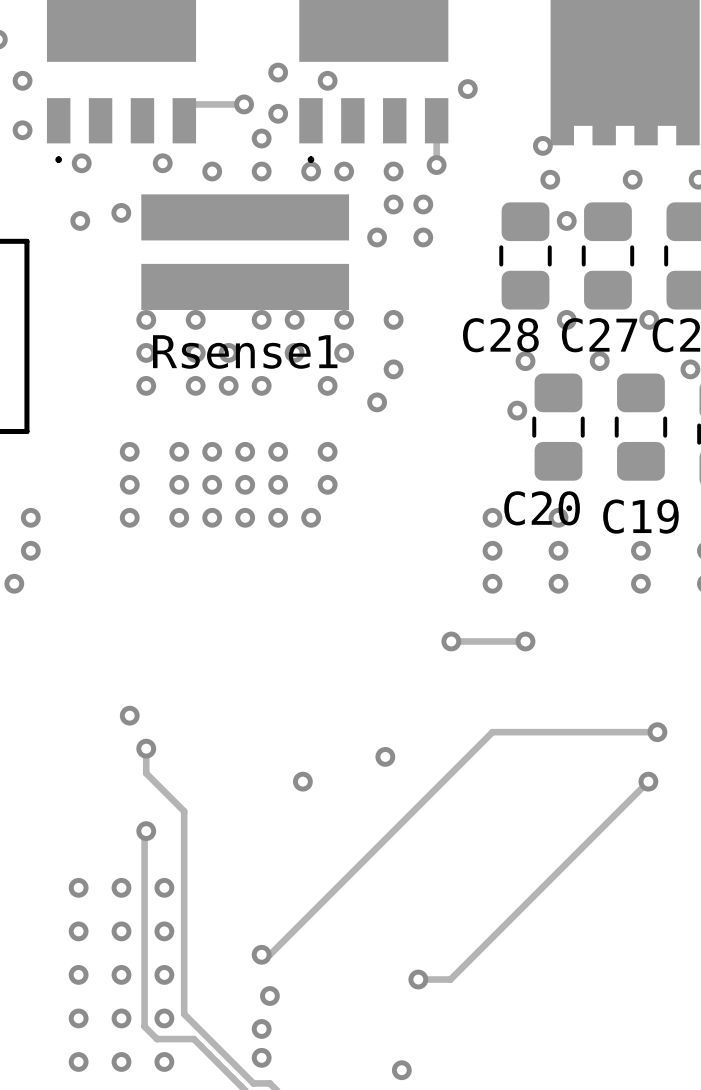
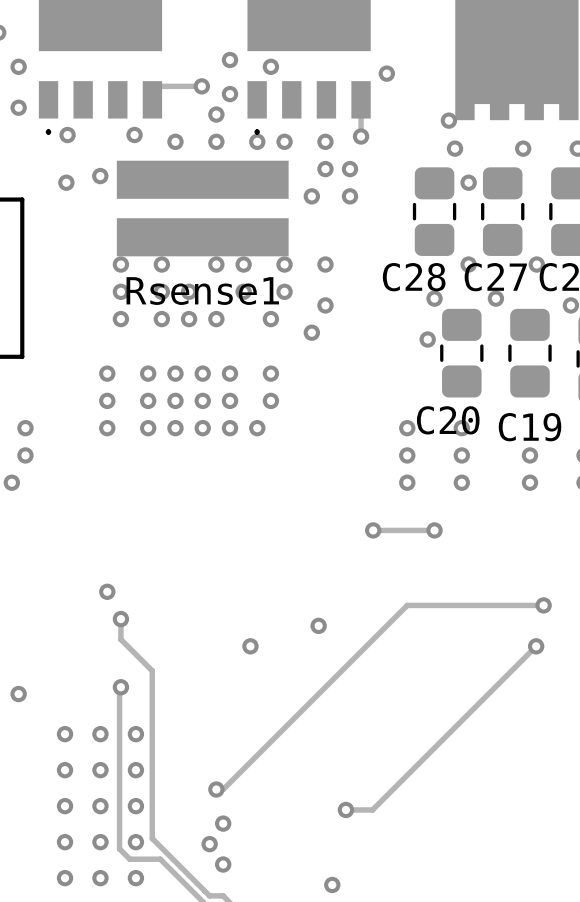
via: none -> (18, 694)
via: none -> (209, 844)
via: (261, 1028) -> none
via: none -> (223, 864)
via: (261, 1057) -> none

